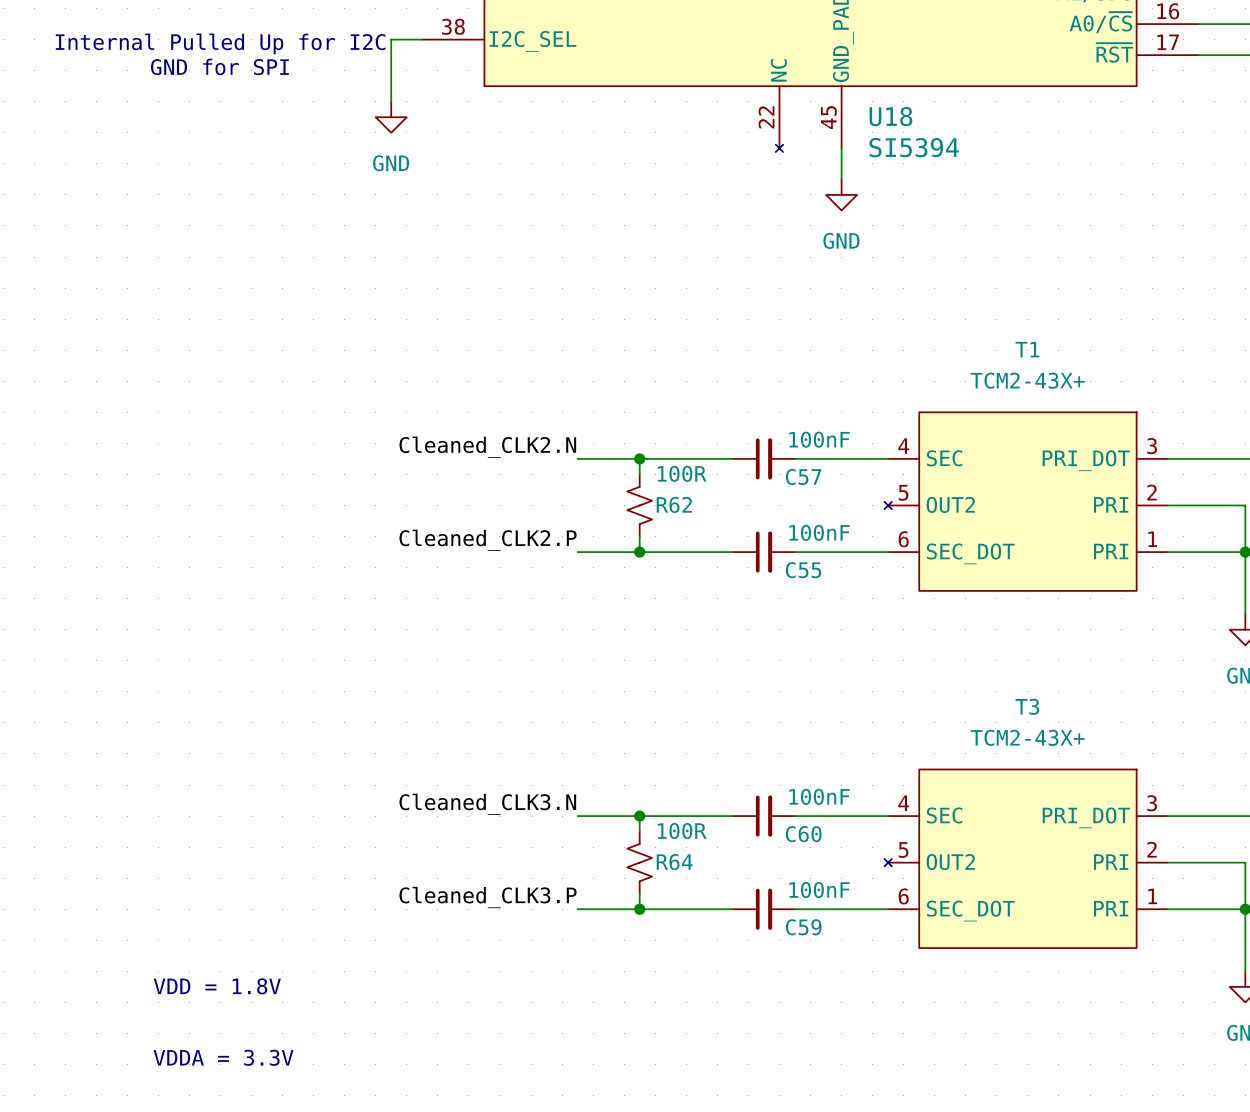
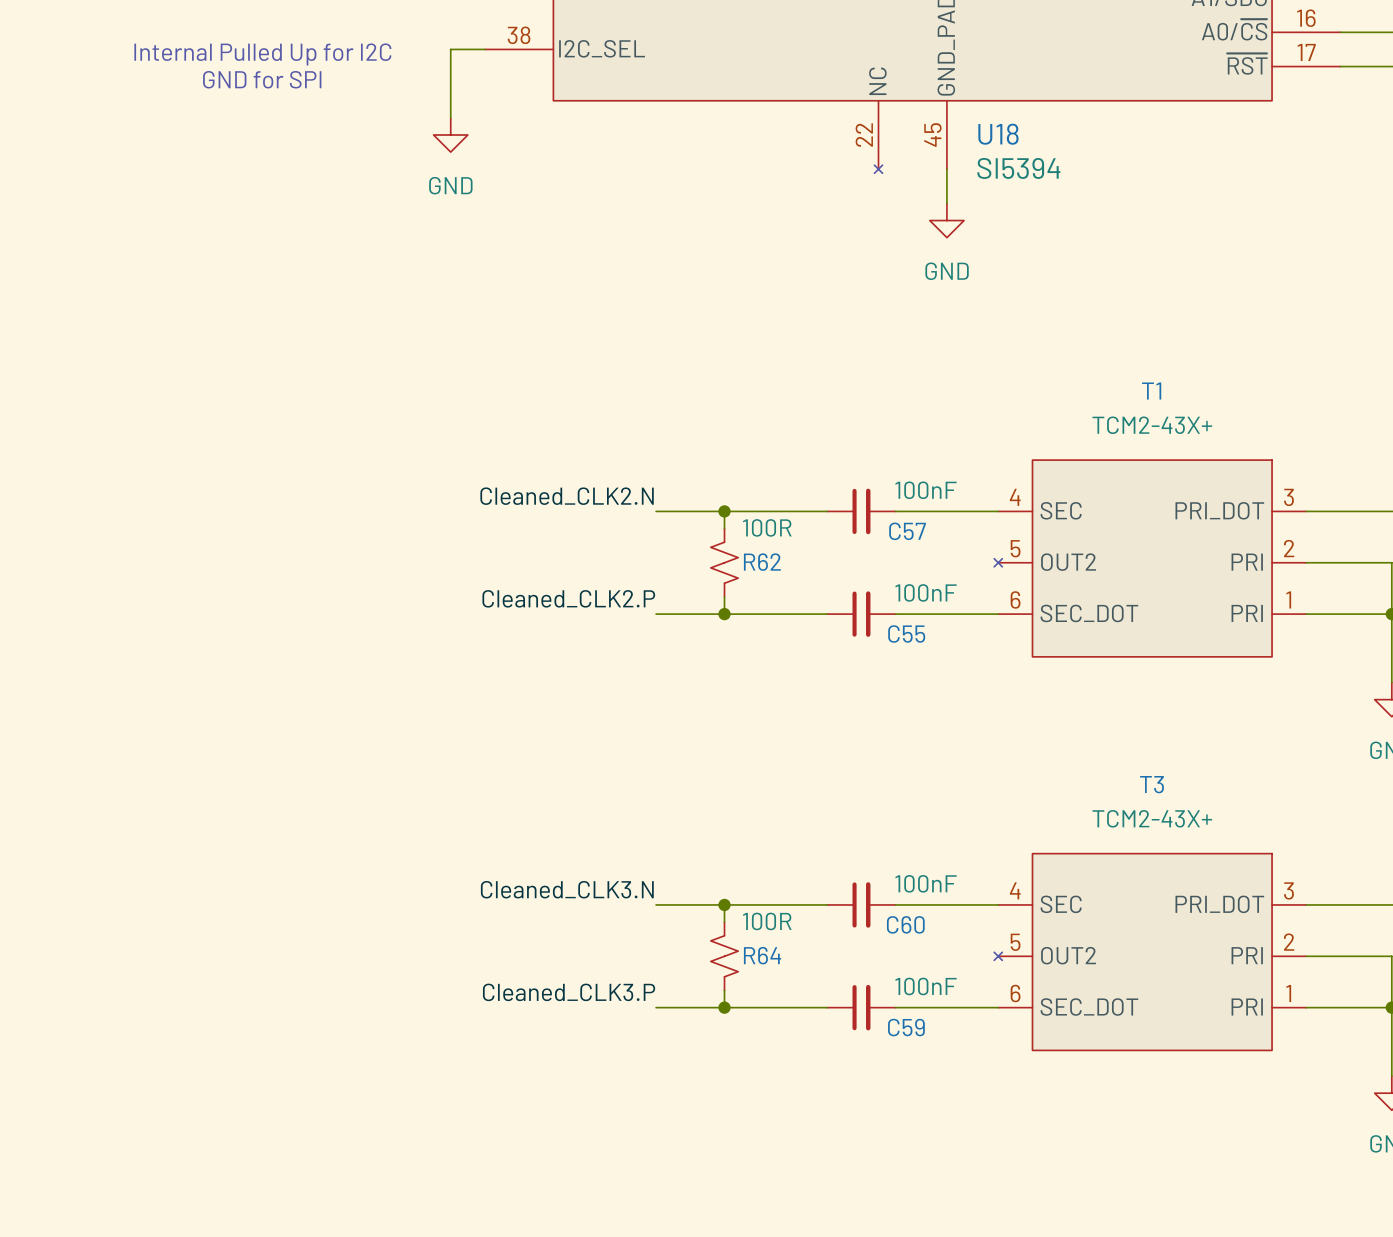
text: VDD = 1.8V (217, 986) -> none
text: VDDA = 3.3V (223, 1057) -> none

